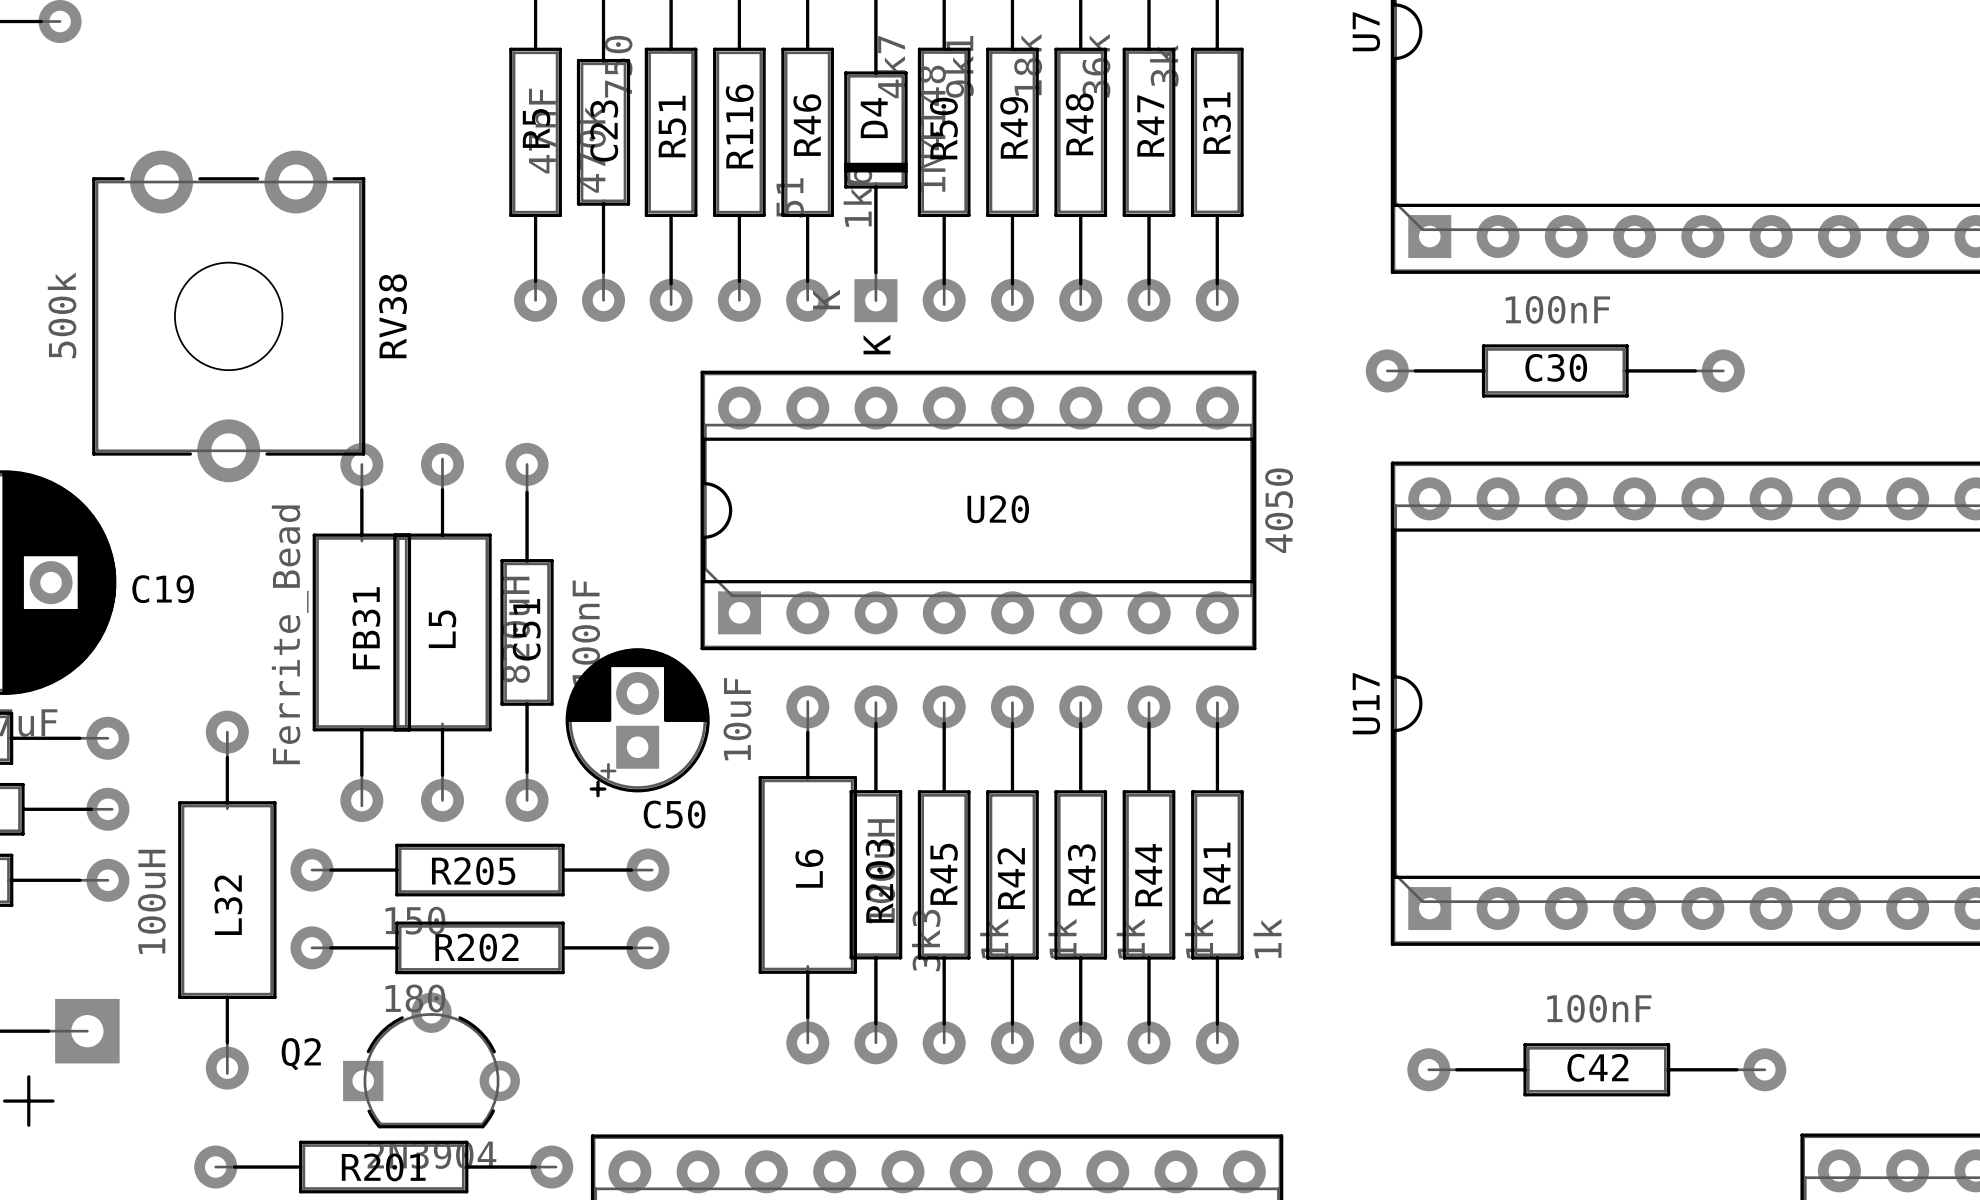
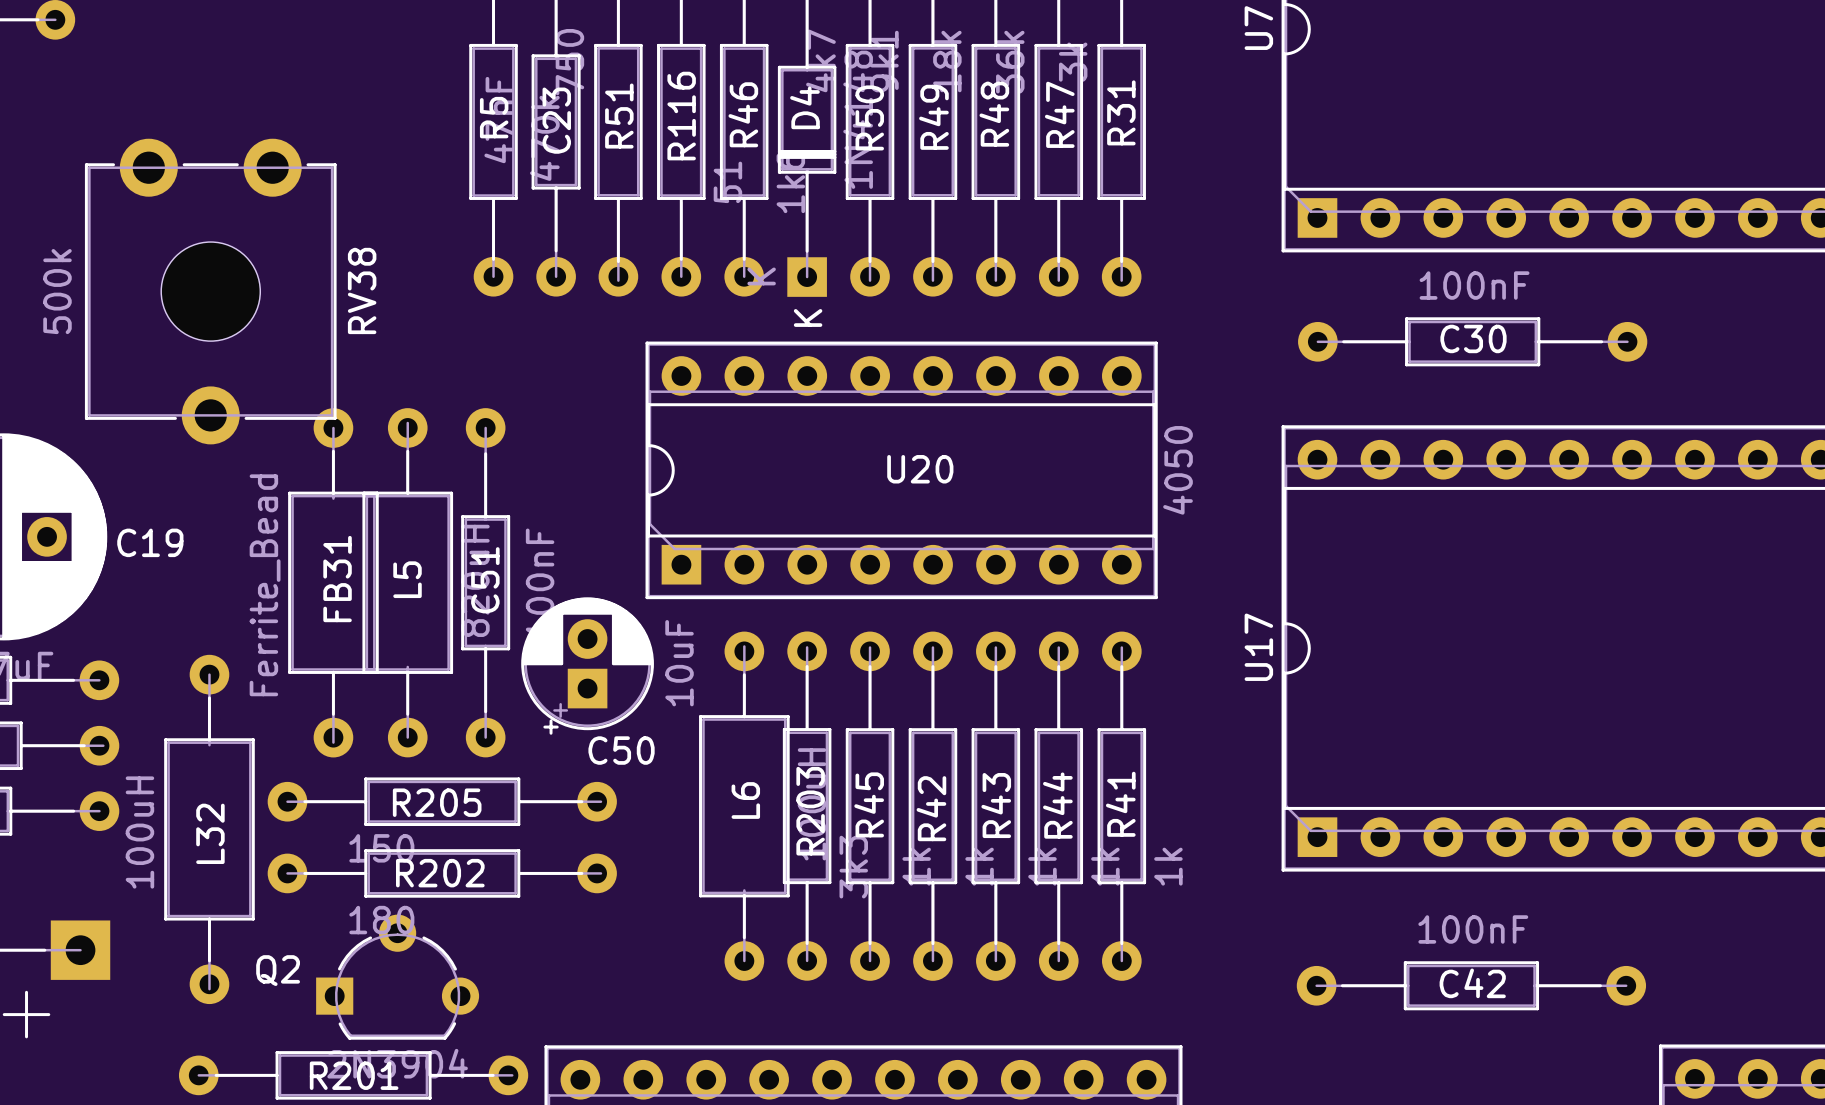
C30 position: (1555, 370) -> (1472, 341)

